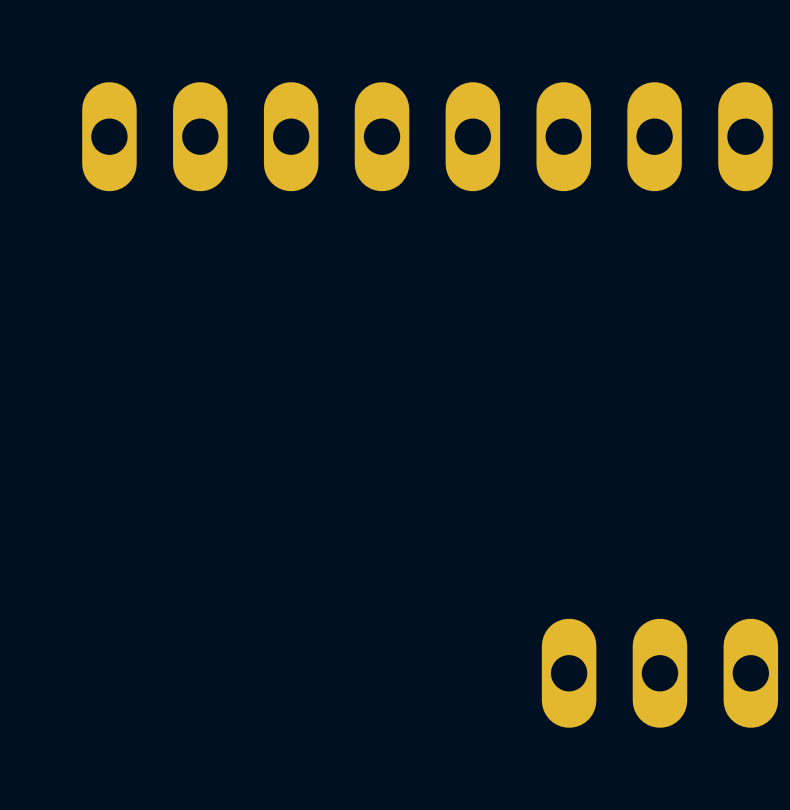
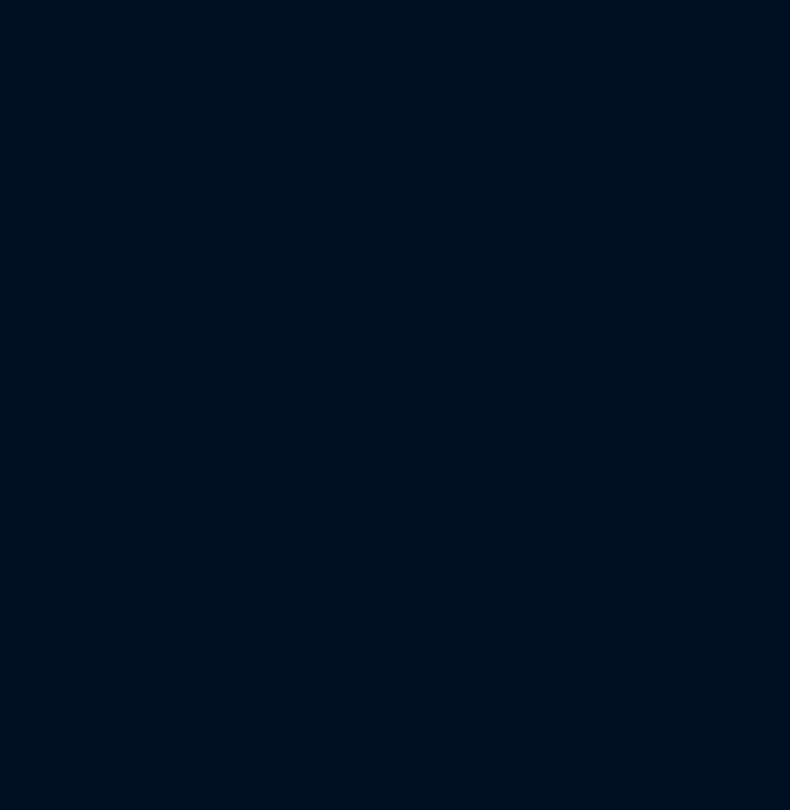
part: (427, 136) -> none
part: (659, 673) -> none

